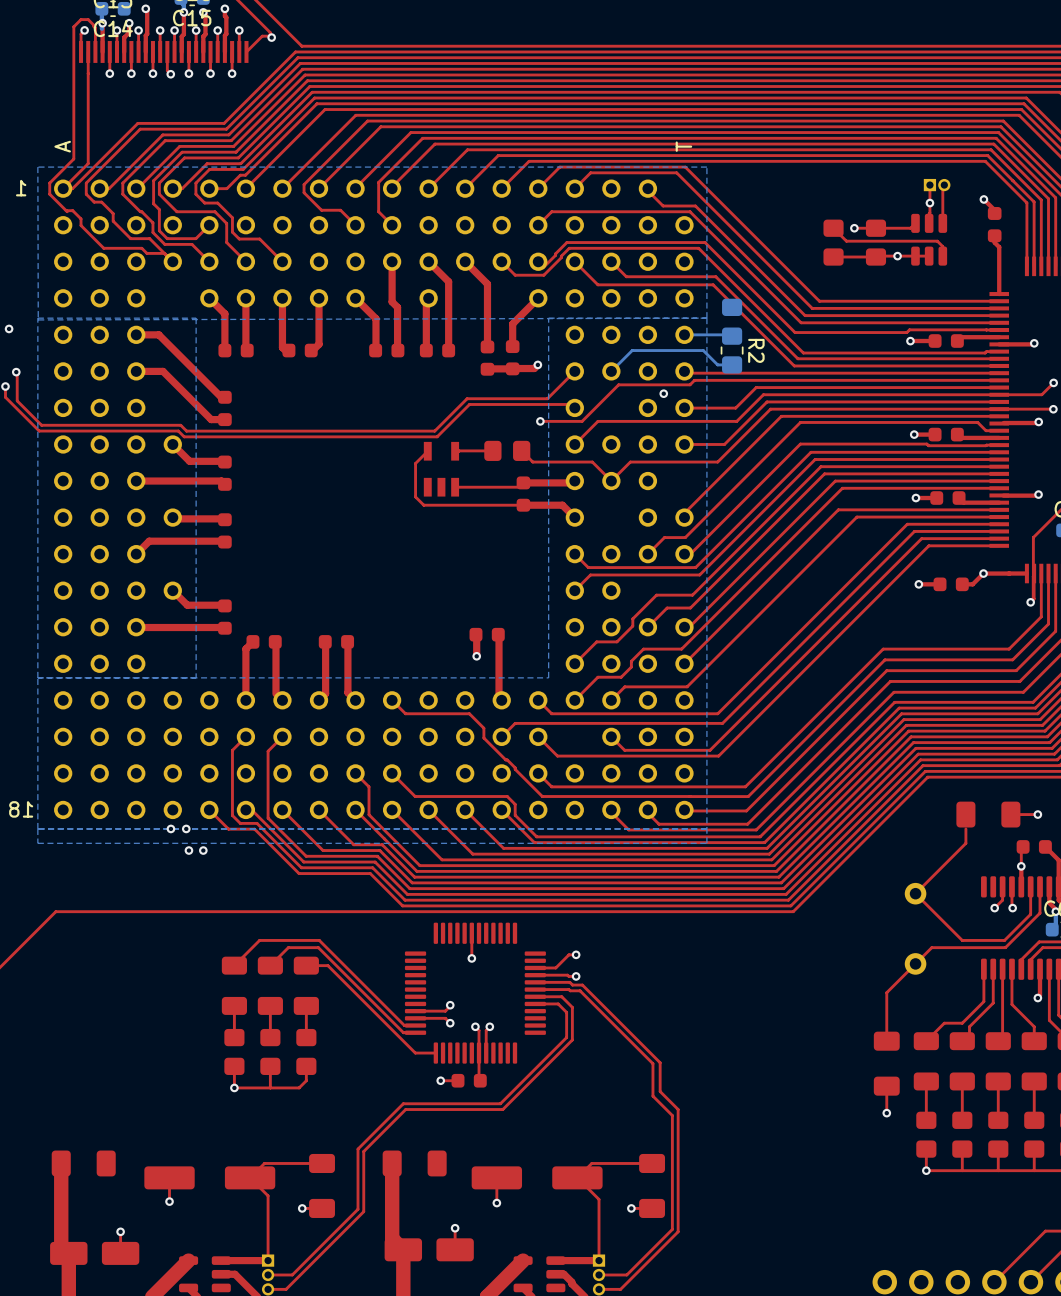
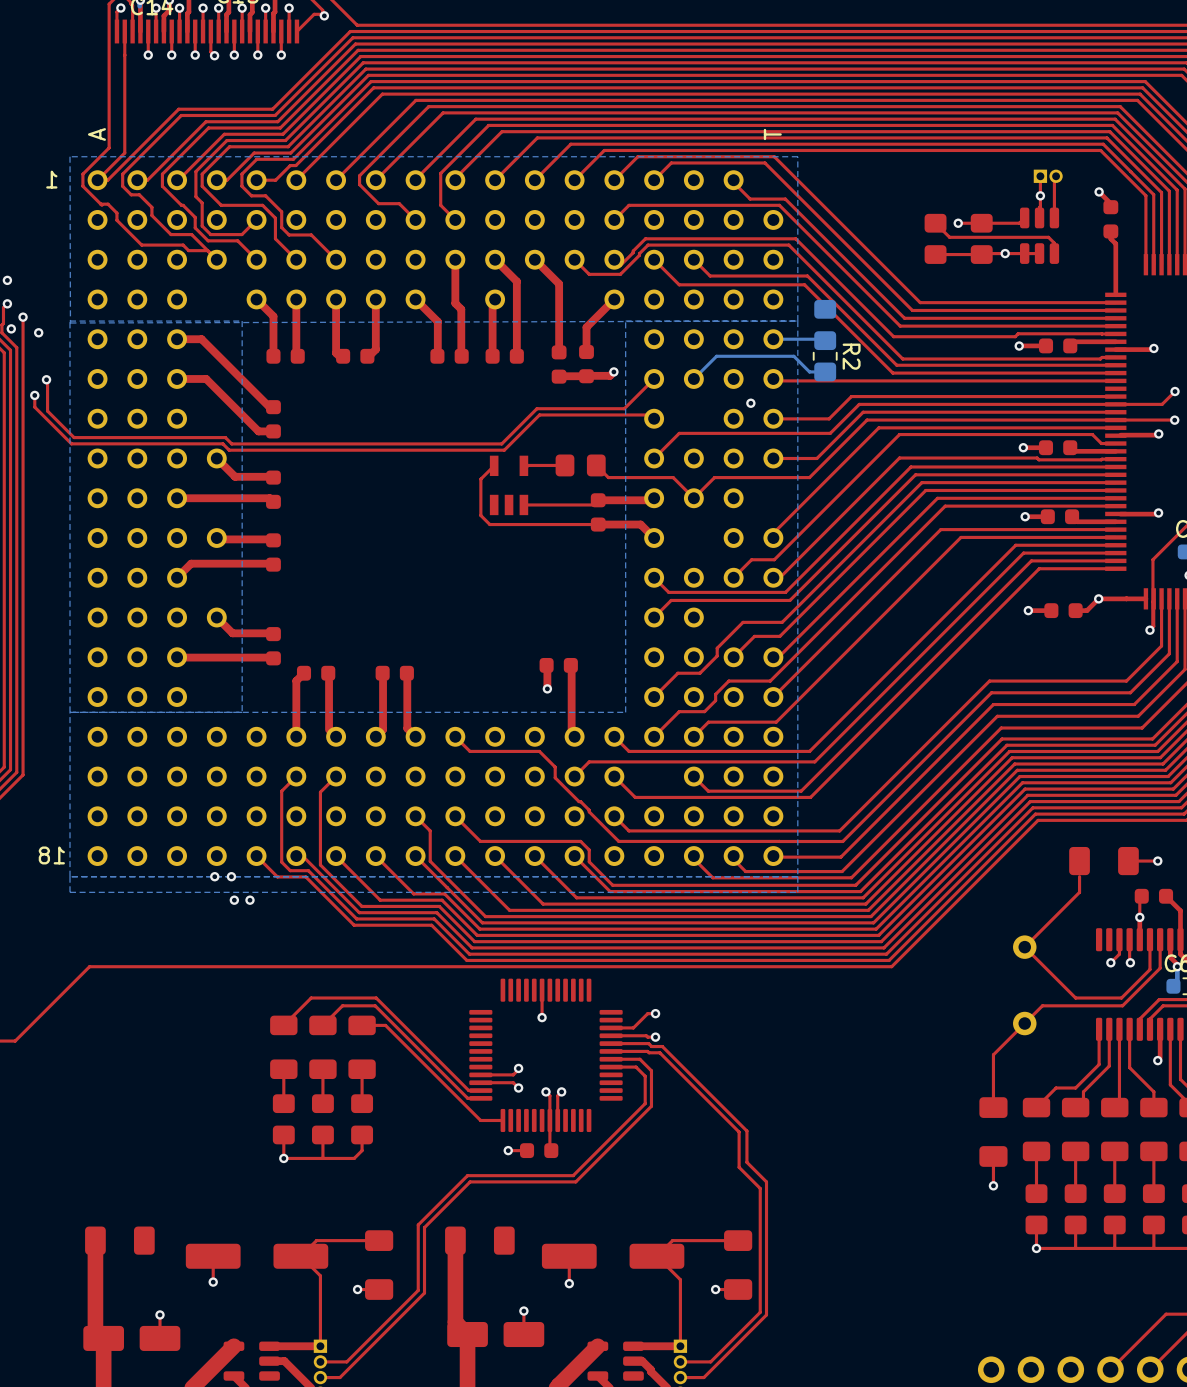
top track: (999, 380) (694, 380) (690, 384) (618, 384) (582, 421) (540, 421) -> none
via: (540, 421) -> none

